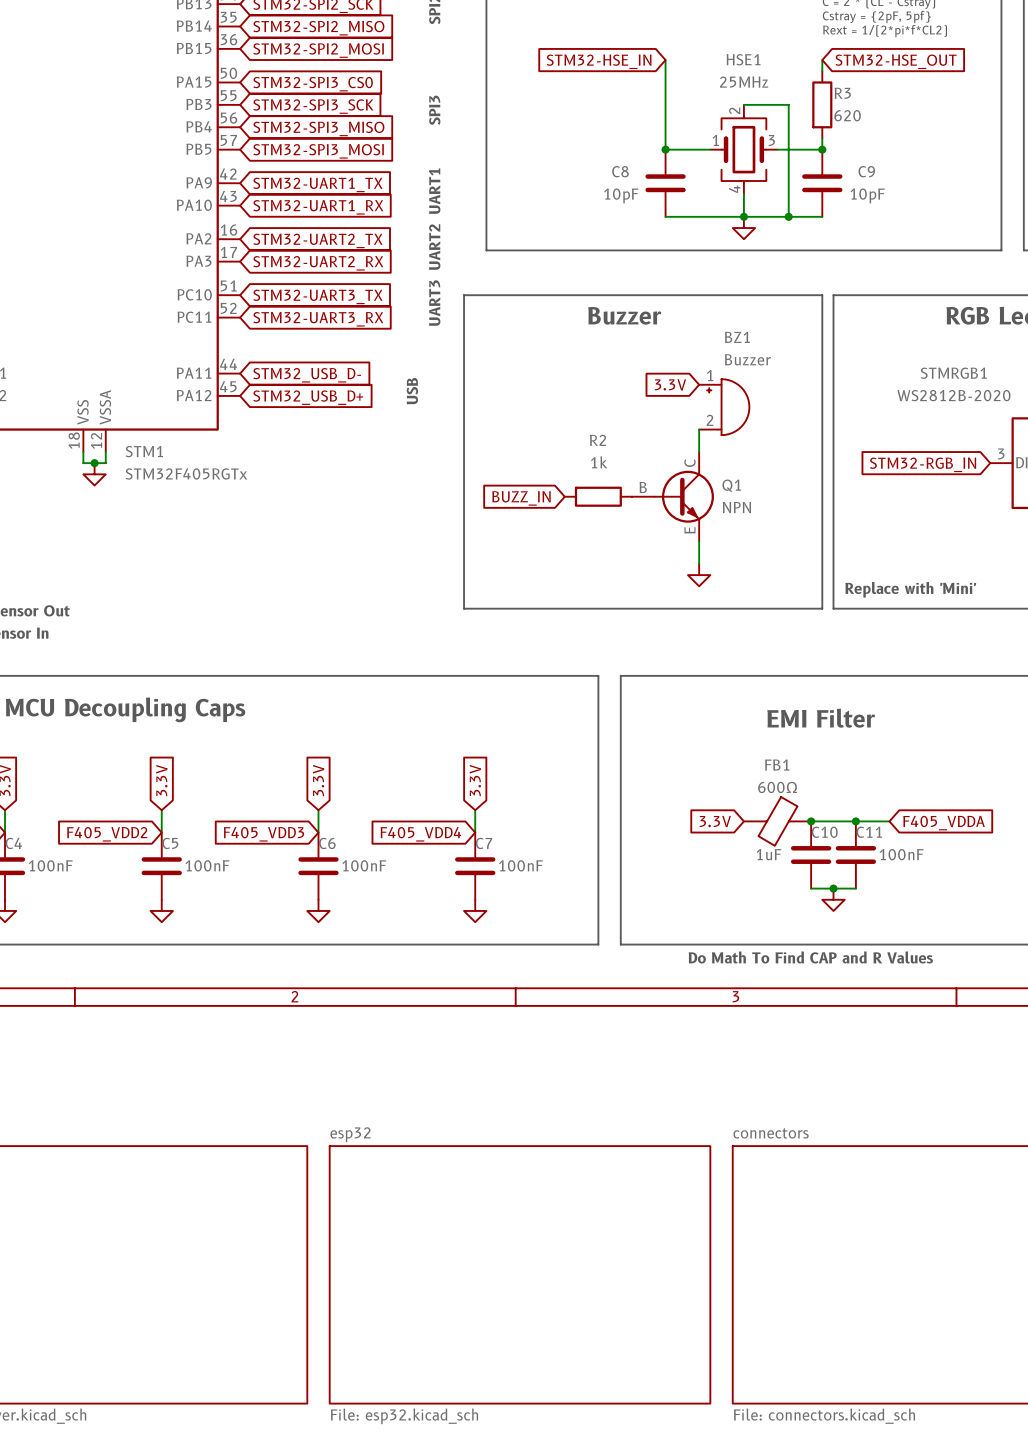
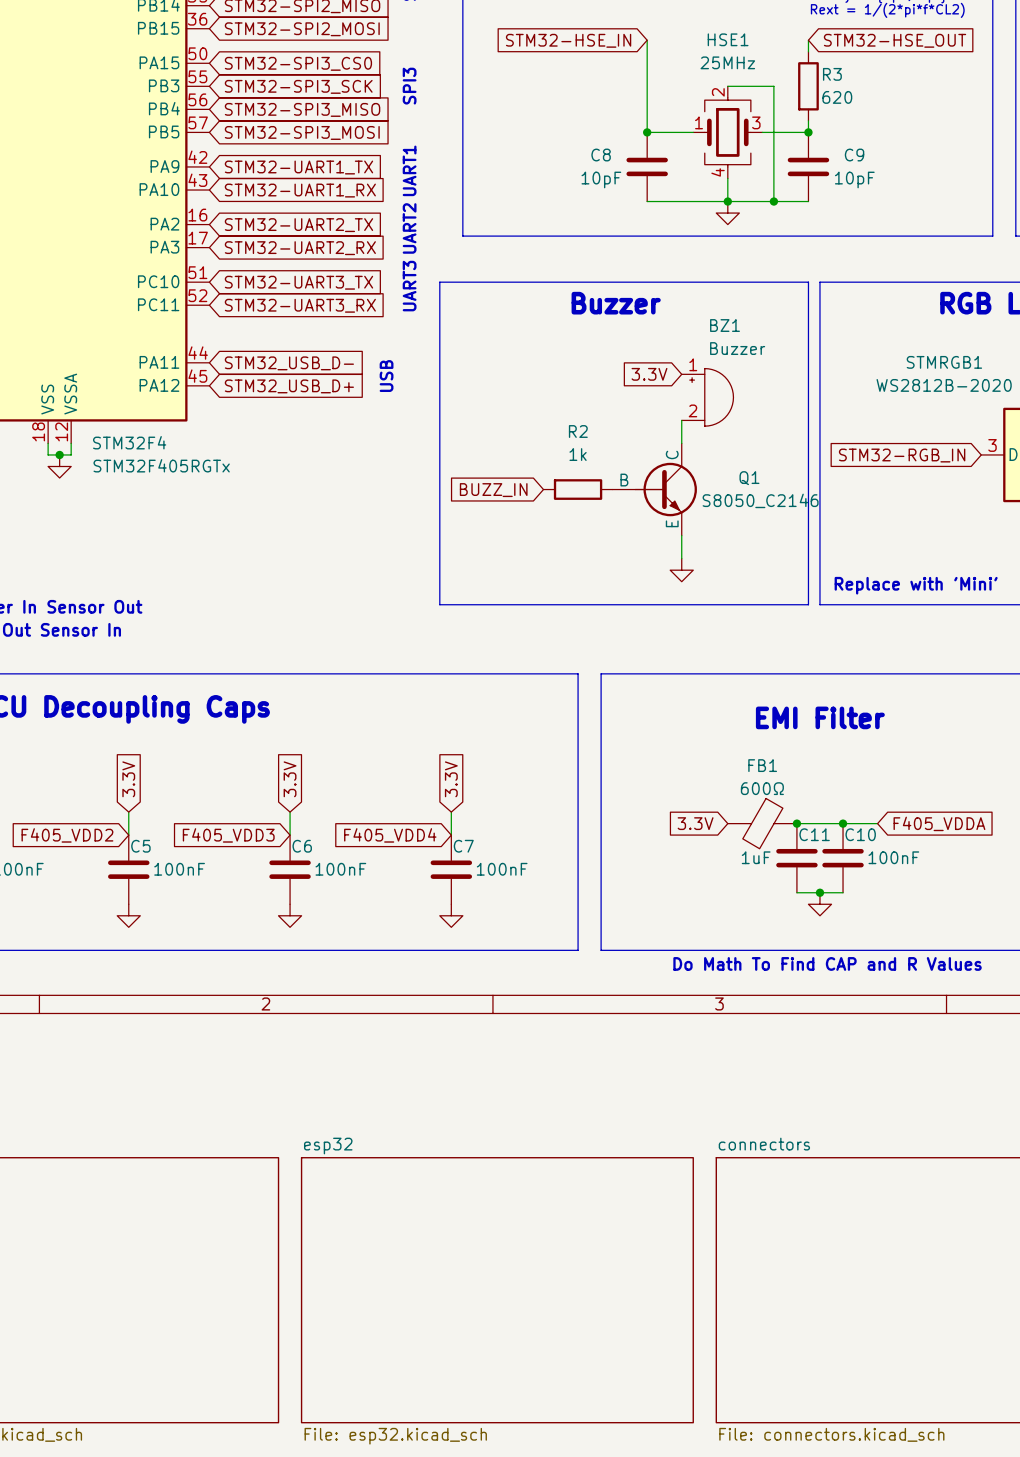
STM1 name: STM1 (144, 451) -> STM32F4 (129, 442)
Q1 name position: Q1 (731, 485) -> Q1 (749, 478)
Q1 value: NPN (736, 507) -> S8050_C2146 (760, 500)
C10 name: C10 (824, 832) -> C11 (814, 834)
C11 name: C11 (869, 832) -> C10 (860, 834)

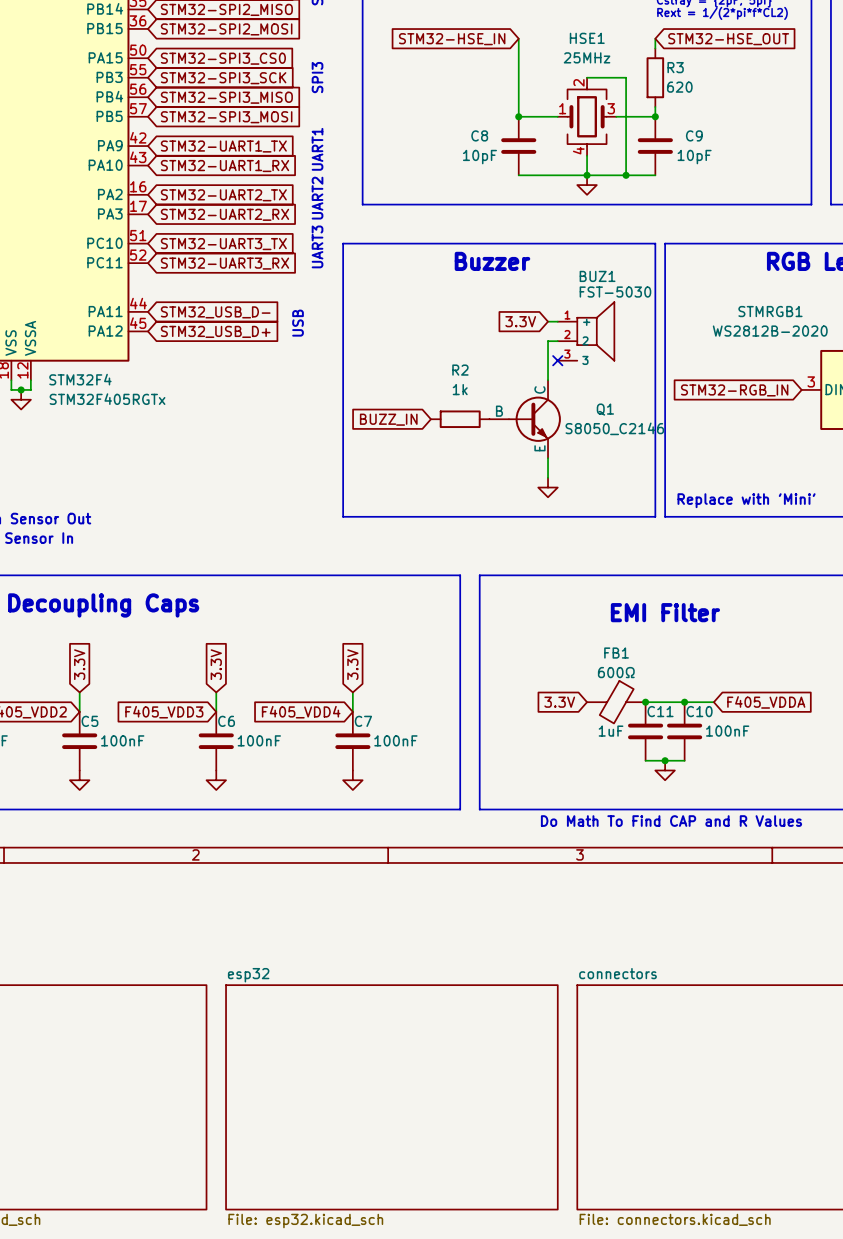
BUZ1: none -> FST-5030 (586, 331)
wire: none -> (557, 341) (548, 341) (548, 360)
BZ1: Buzzer (707, 397) -> none
no-connect mark: none -> (557, 360)

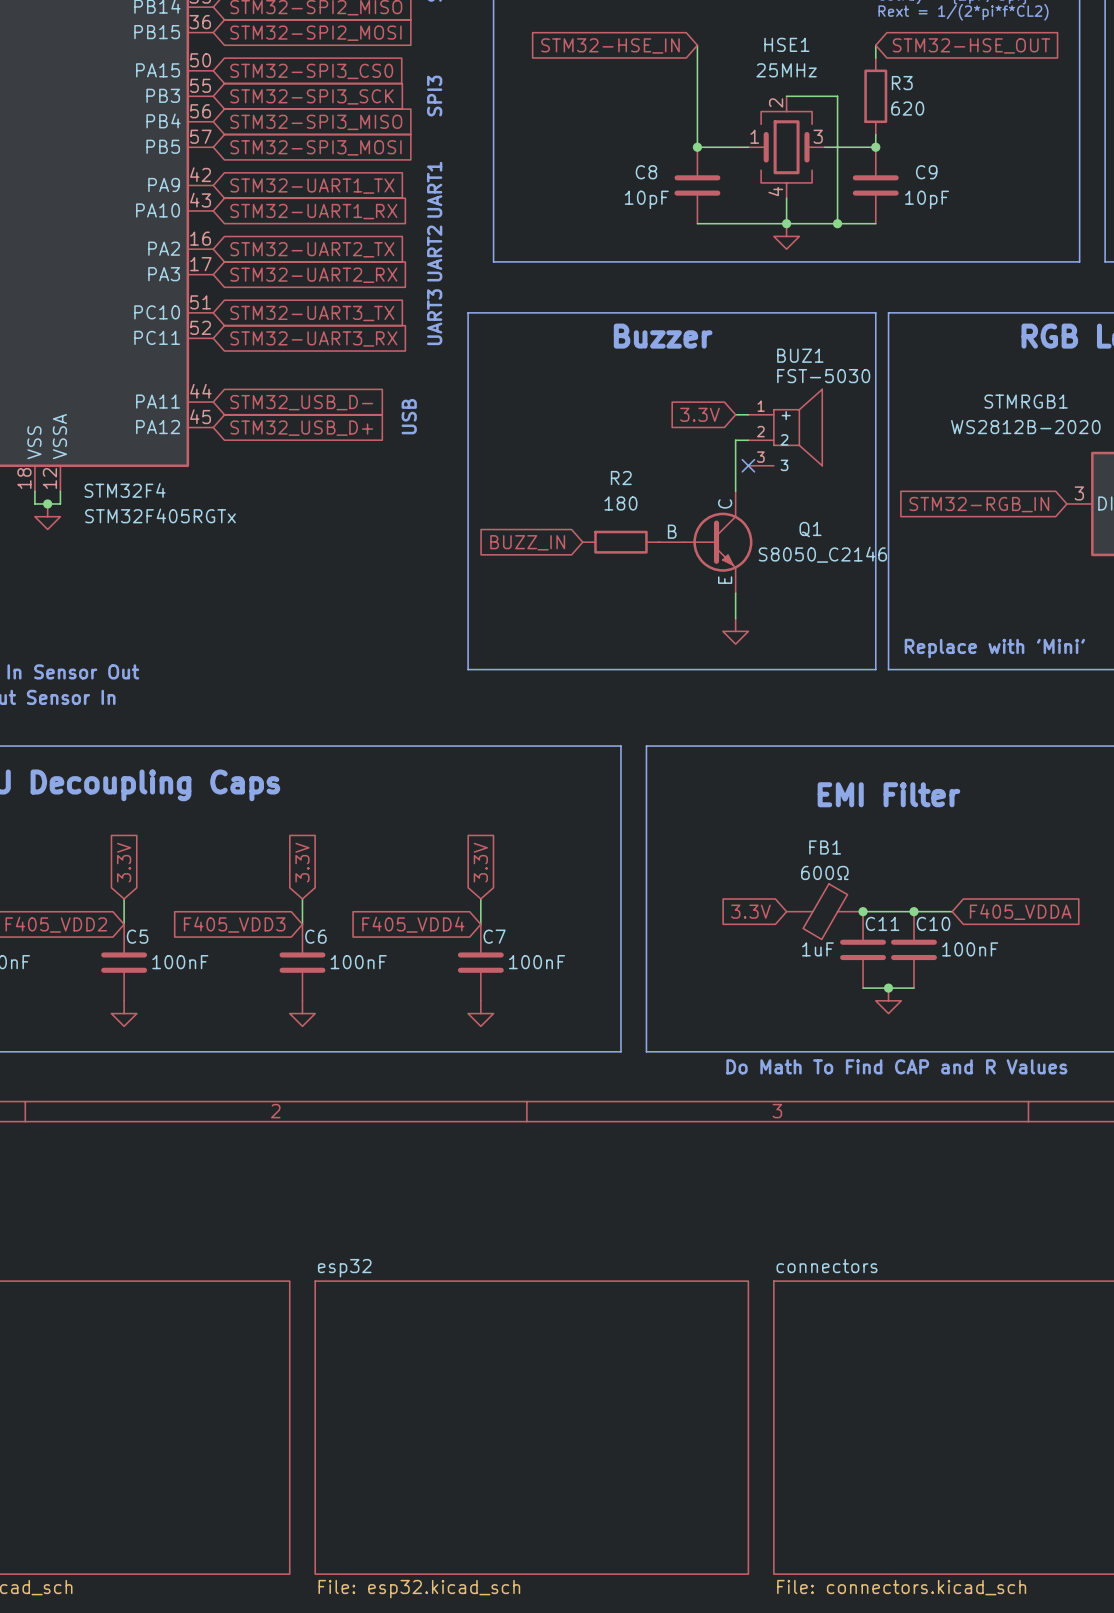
R2 value: 1k (460, 389) -> 180 (620, 503)

